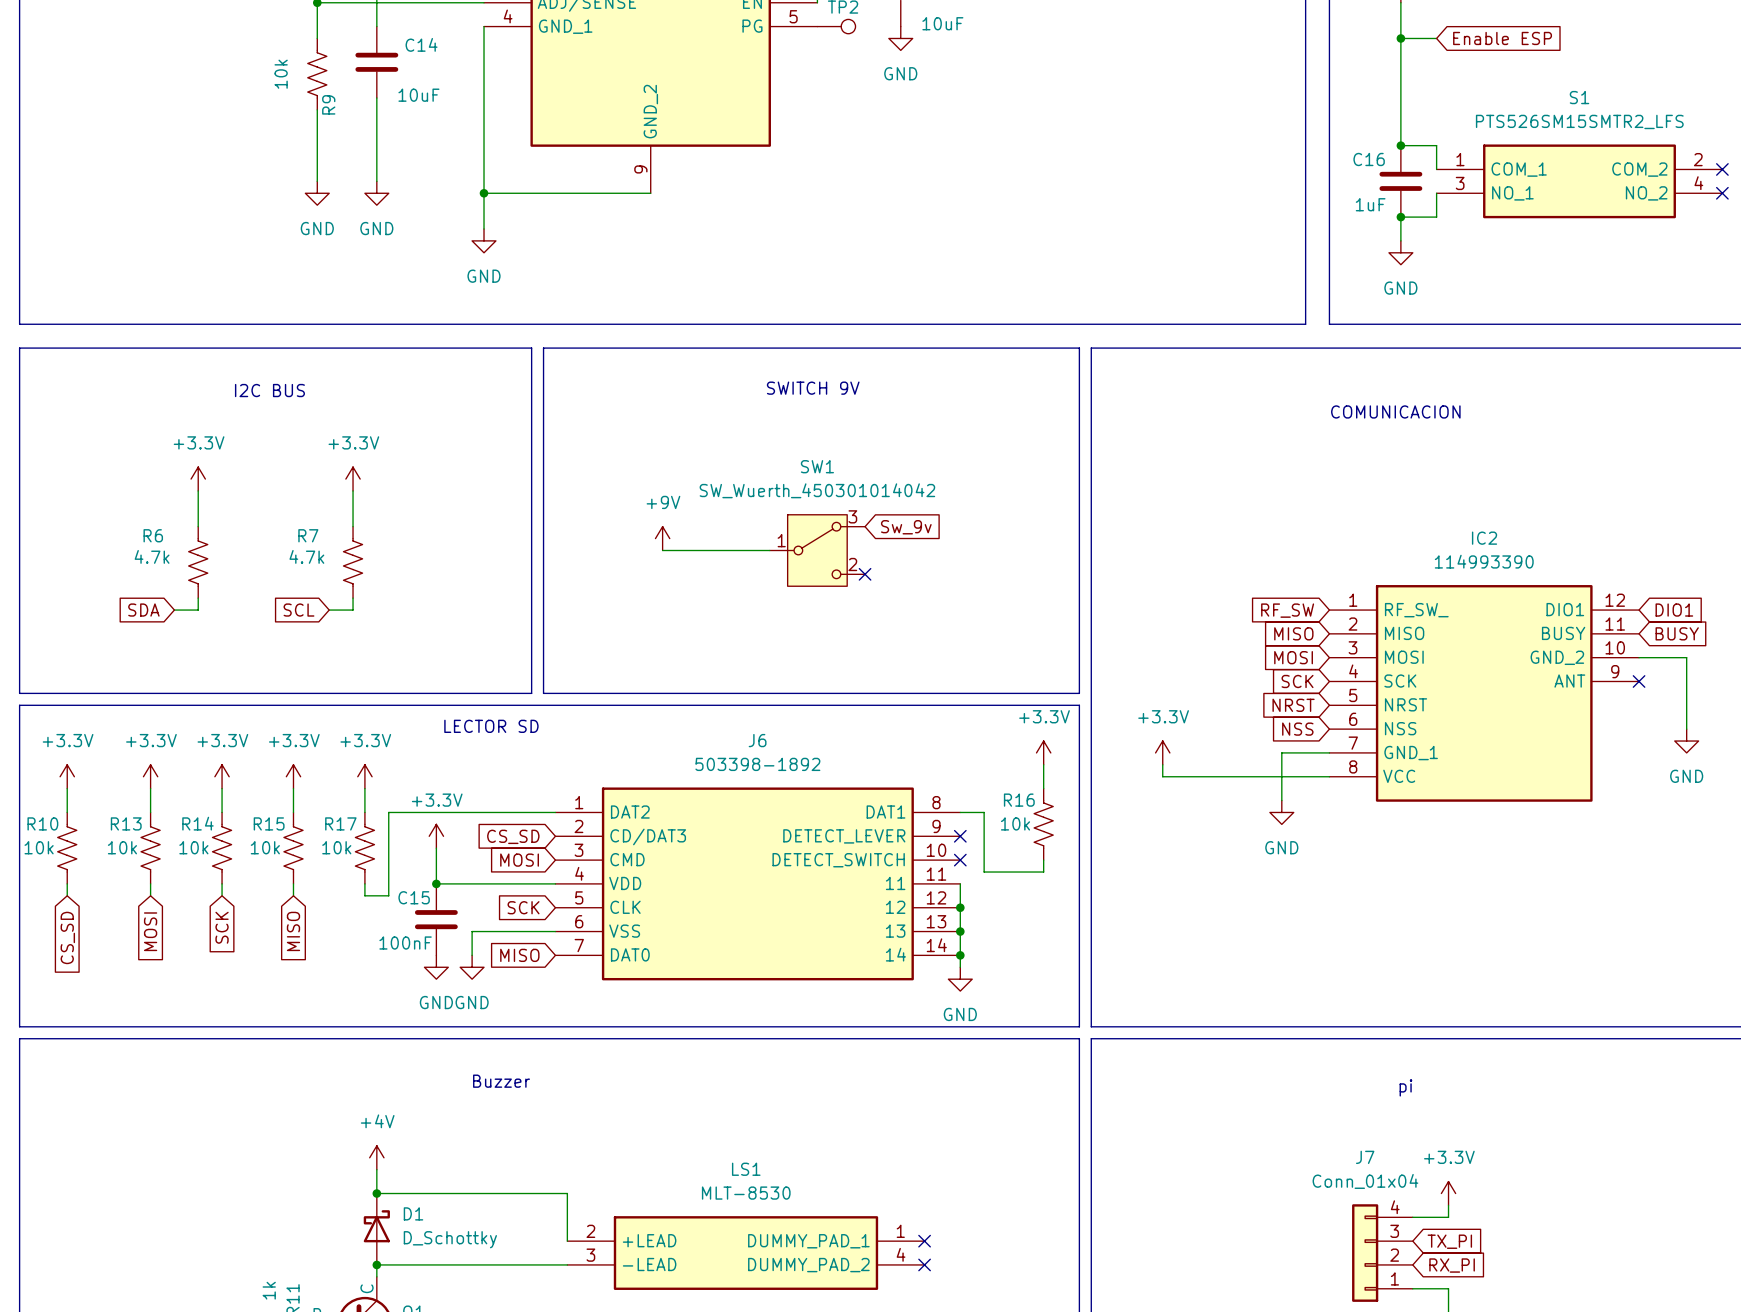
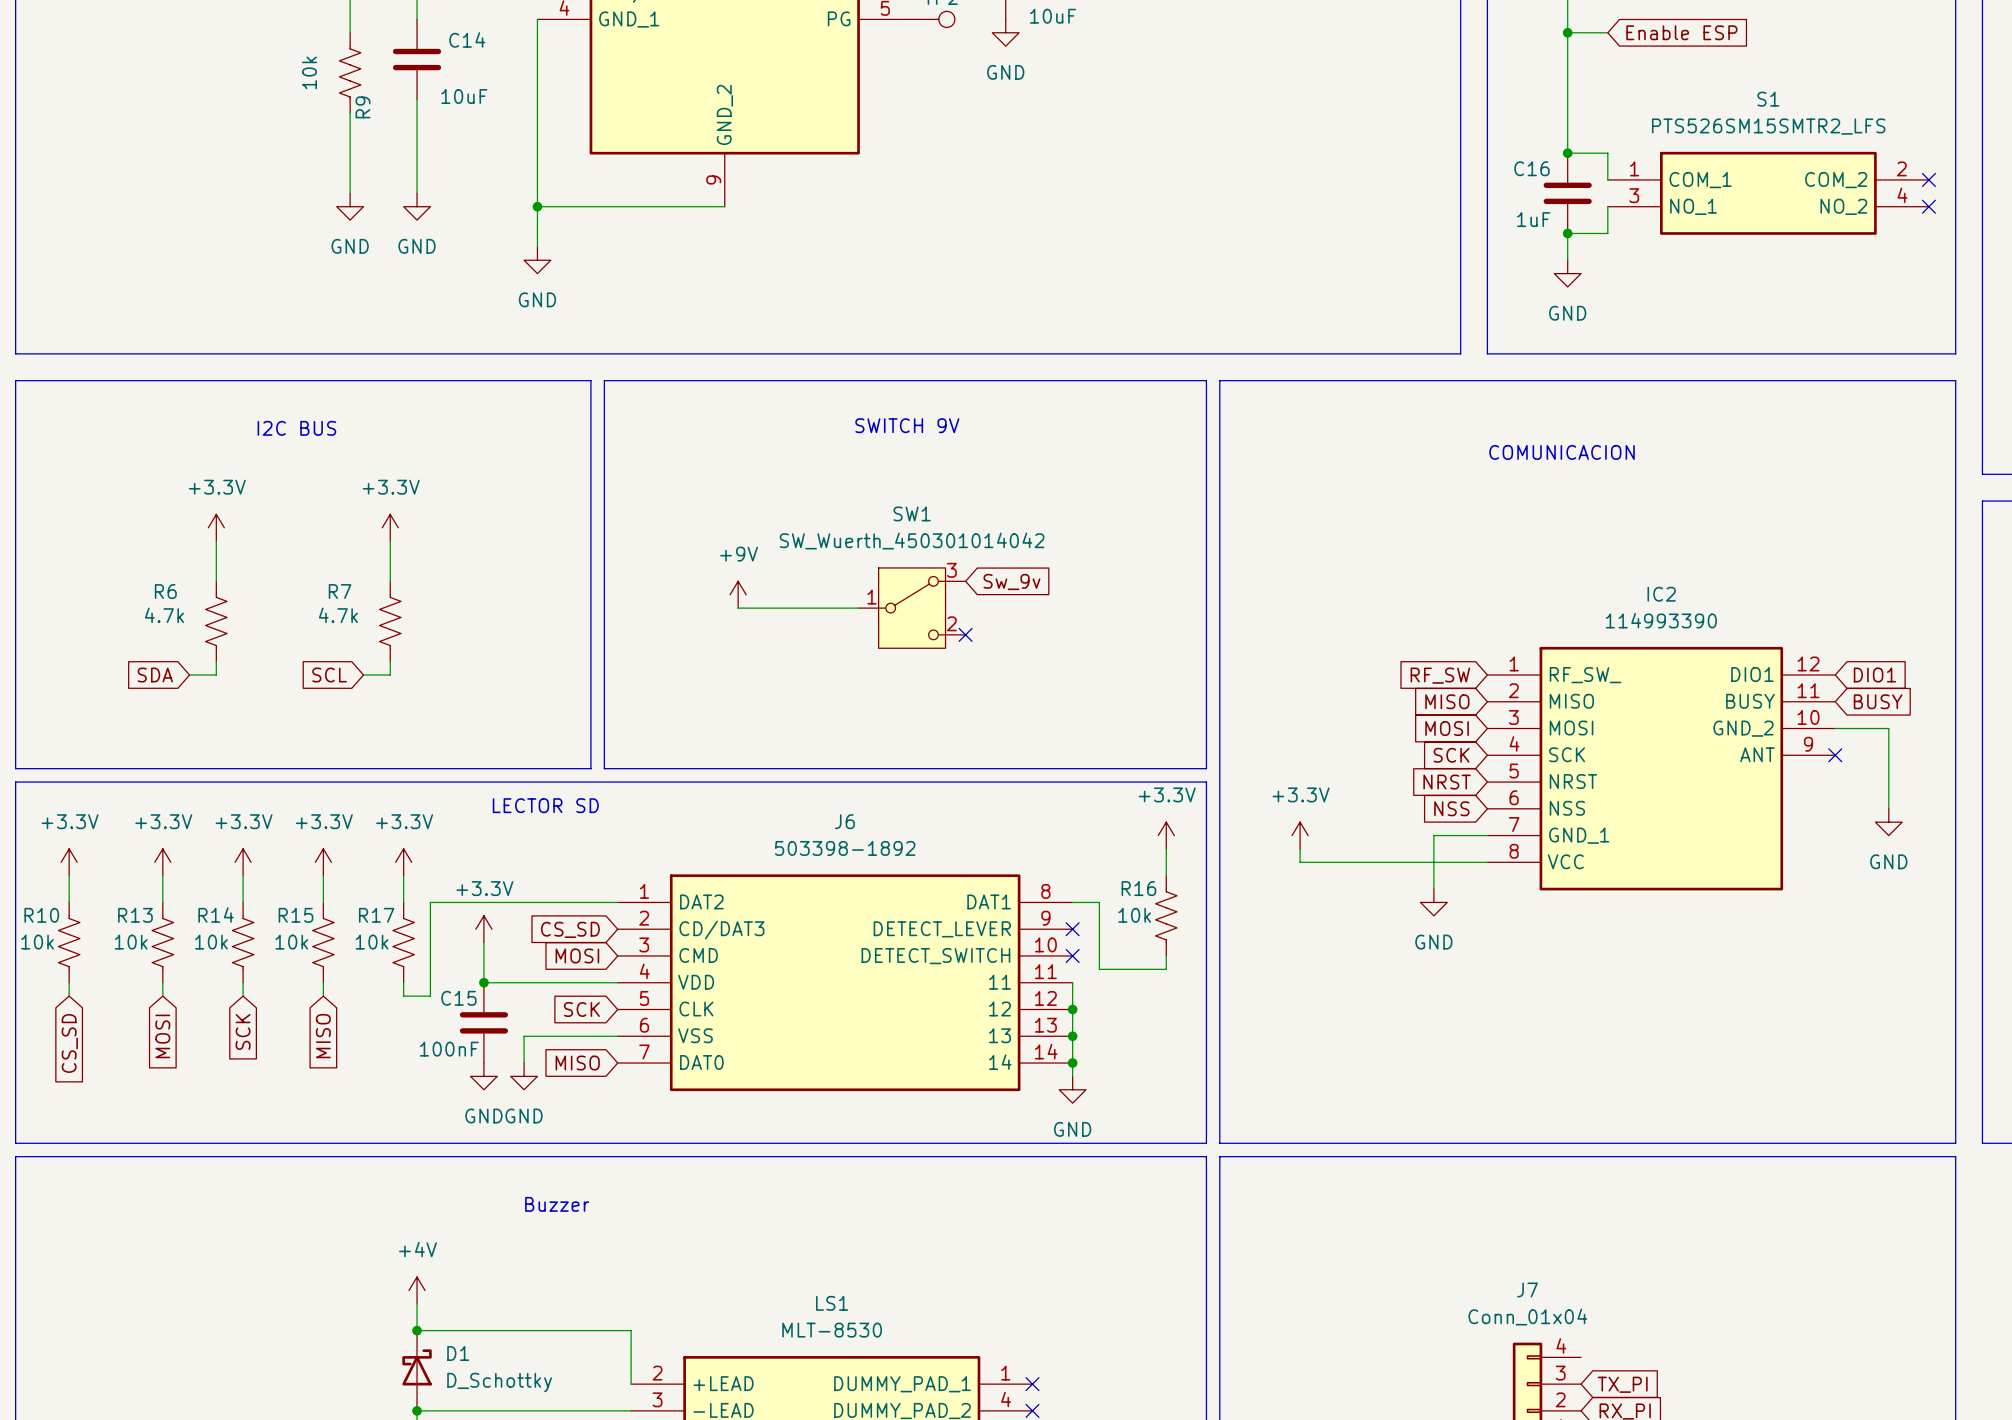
text: pi (1405, 1087) -> none
power symbol: +3.3V (1448, 1193) -> none
wire: (1448, 1205) (1448, 1217) (1412, 1217) -> none

